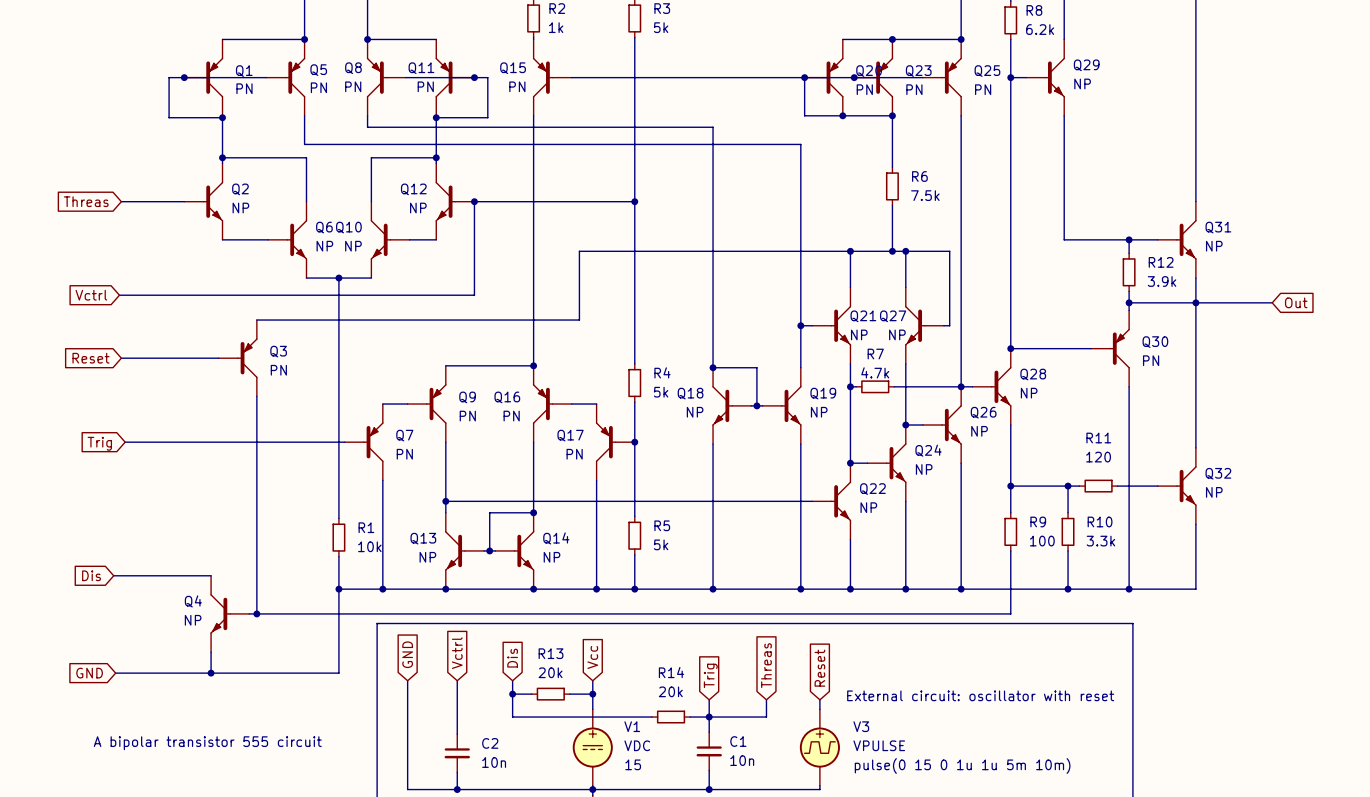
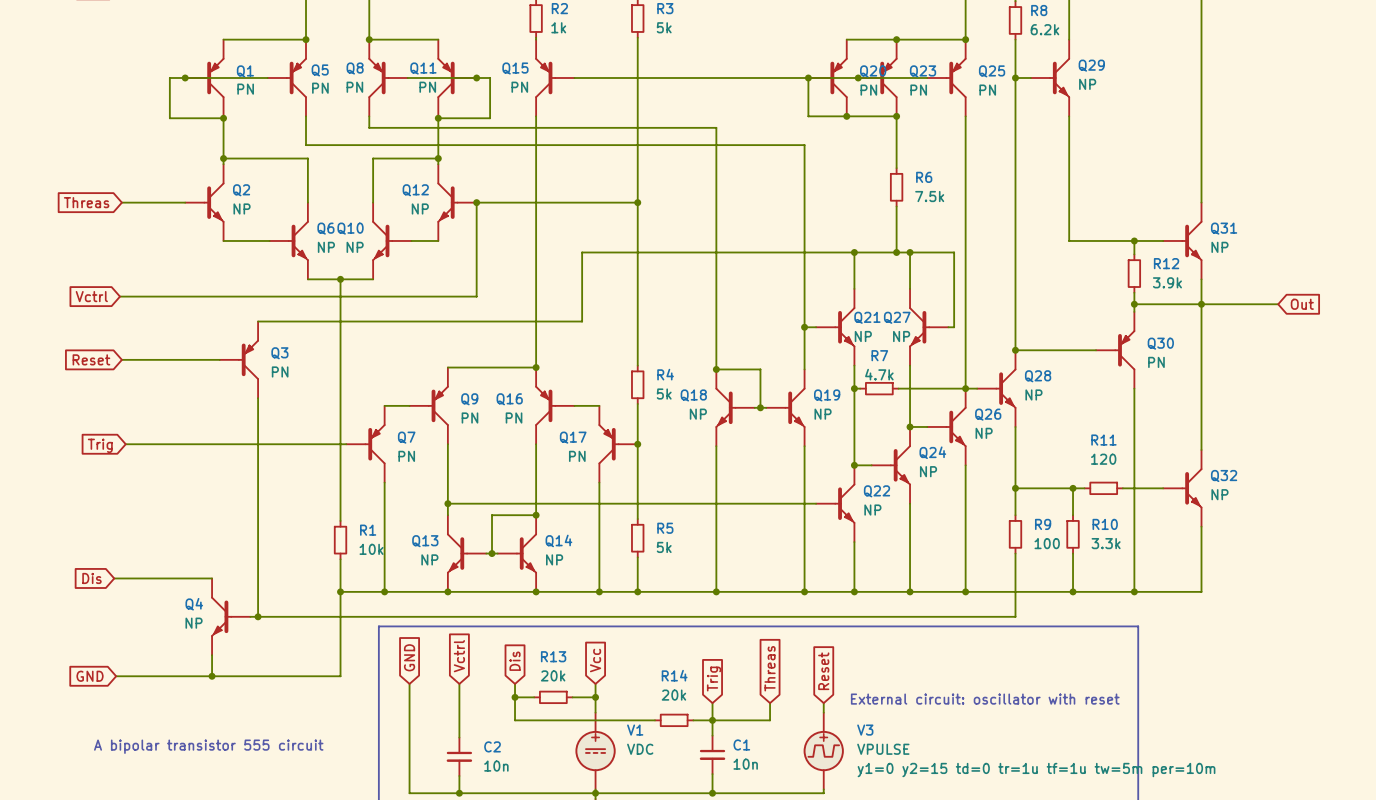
V1 text: 15 (633, 764) -> none
V3 text: pulse(0 15 0 1u 1u 5m 10m) (962, 766) -> none
V3 text: none -> y1=0 y2=15 td=0 tr=1u tf=1u tw=5m per=10m (1036, 770)

